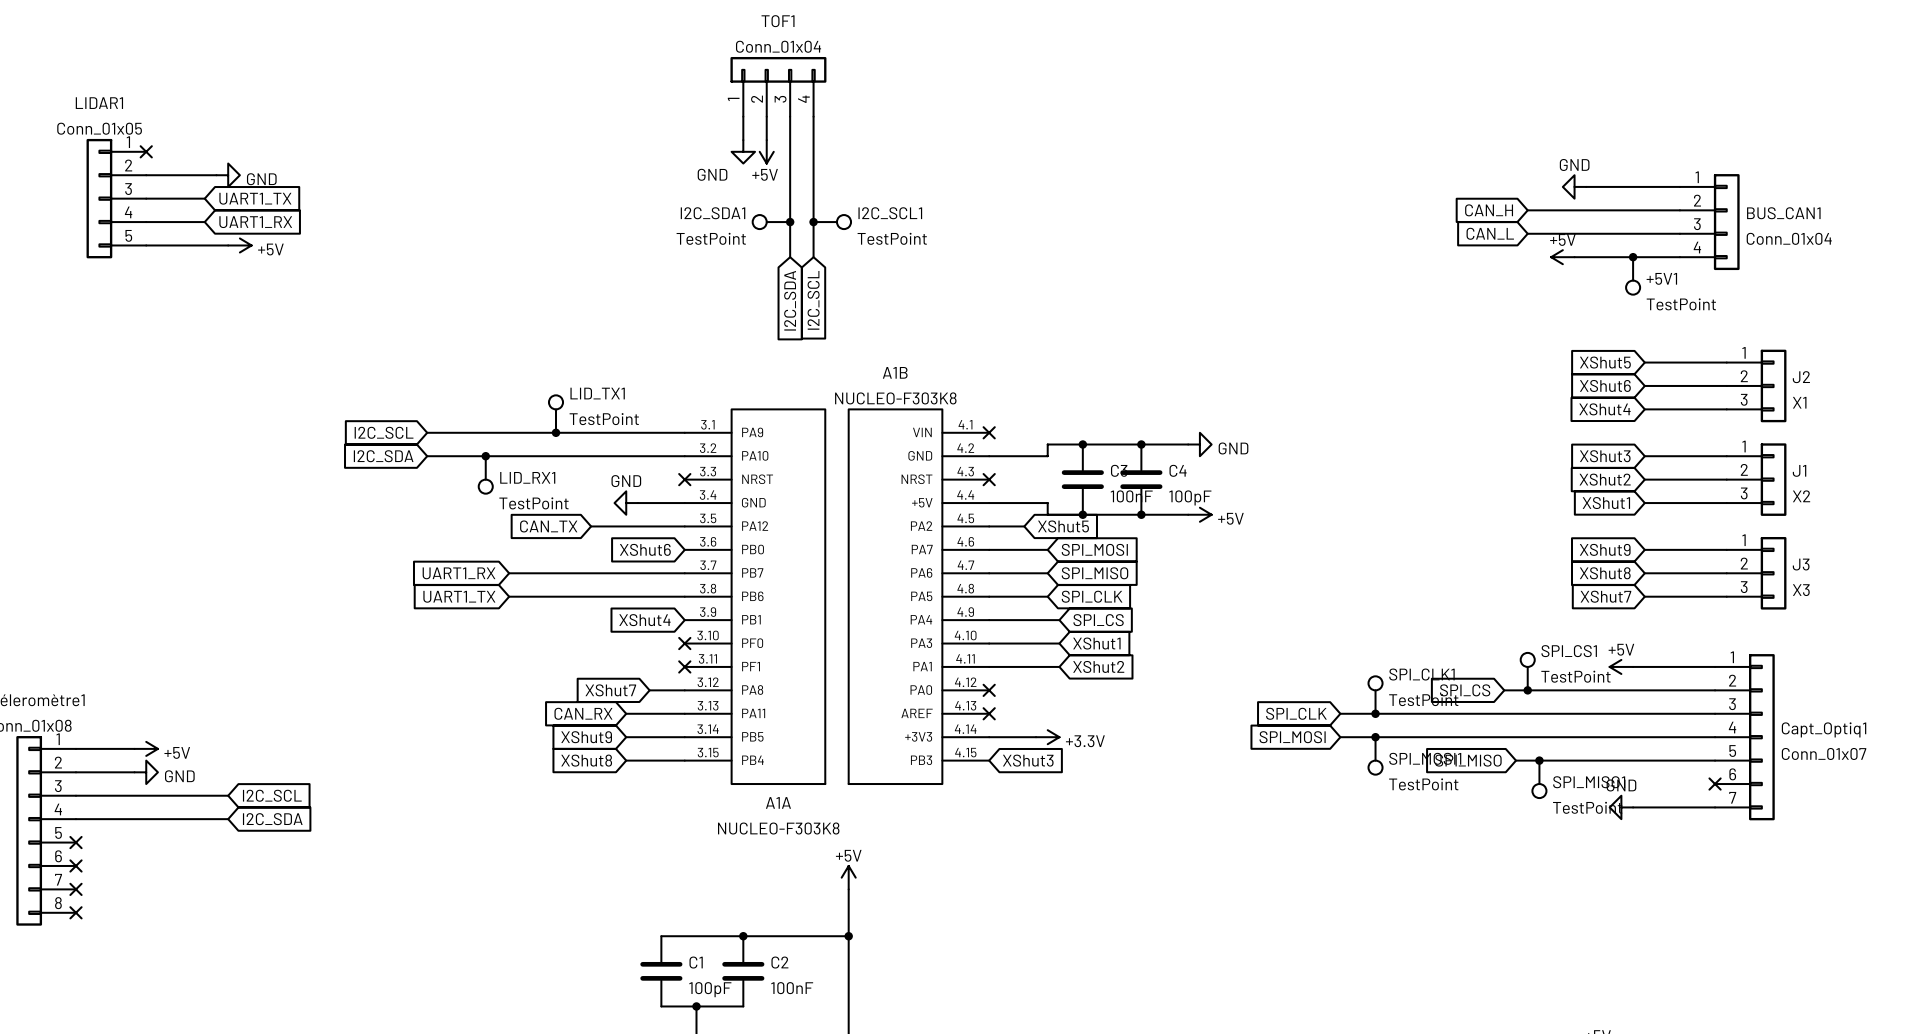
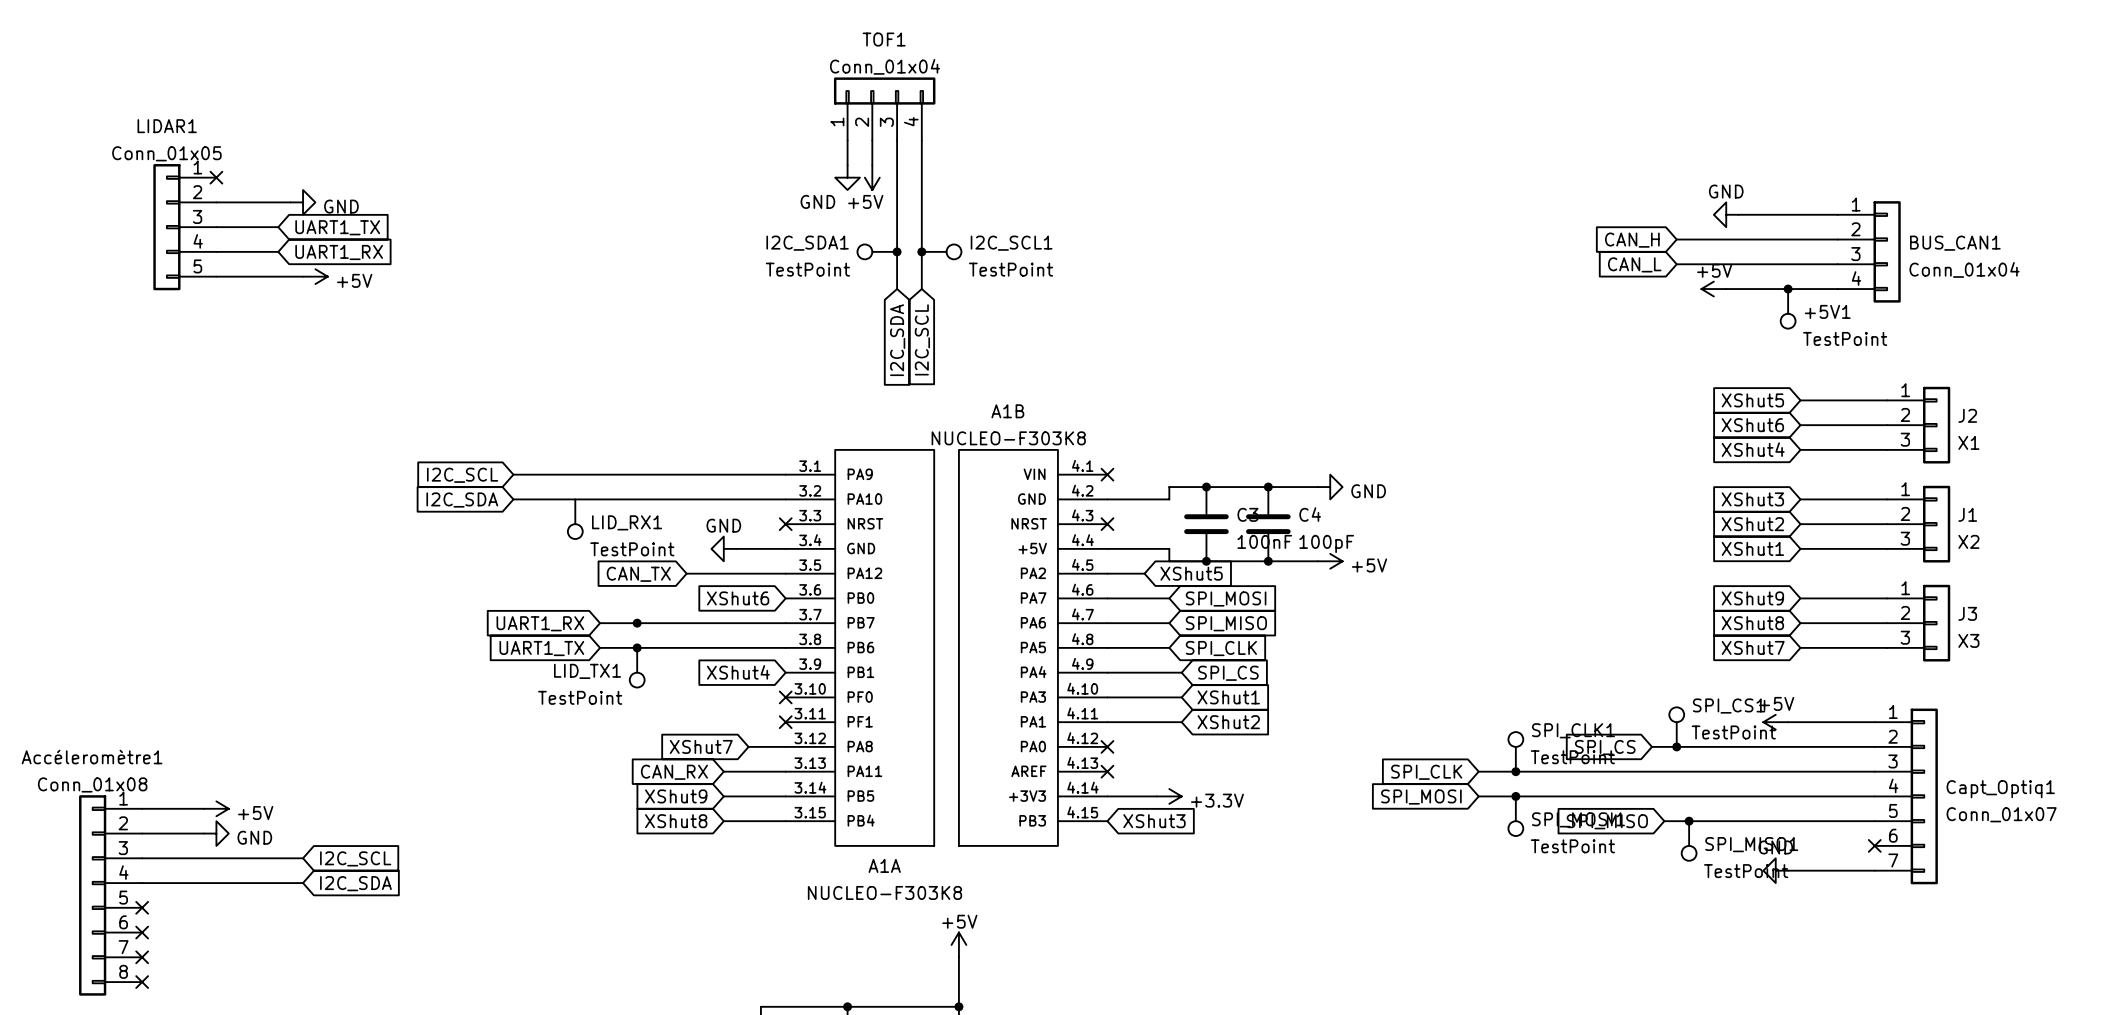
LID_TX1 rotation: 0° (556, 402) -> 180° (637, 680)
LID_TX1 position: (556, 414) -> (637, 667)
LID_TX1 value position: TestPoint (604, 419) -> TestPoint (580, 697)
junction: (556, 432) -> none
junction: (485, 456) -> none
junction: none -> (637, 623)
junction: none -> (637, 647)

